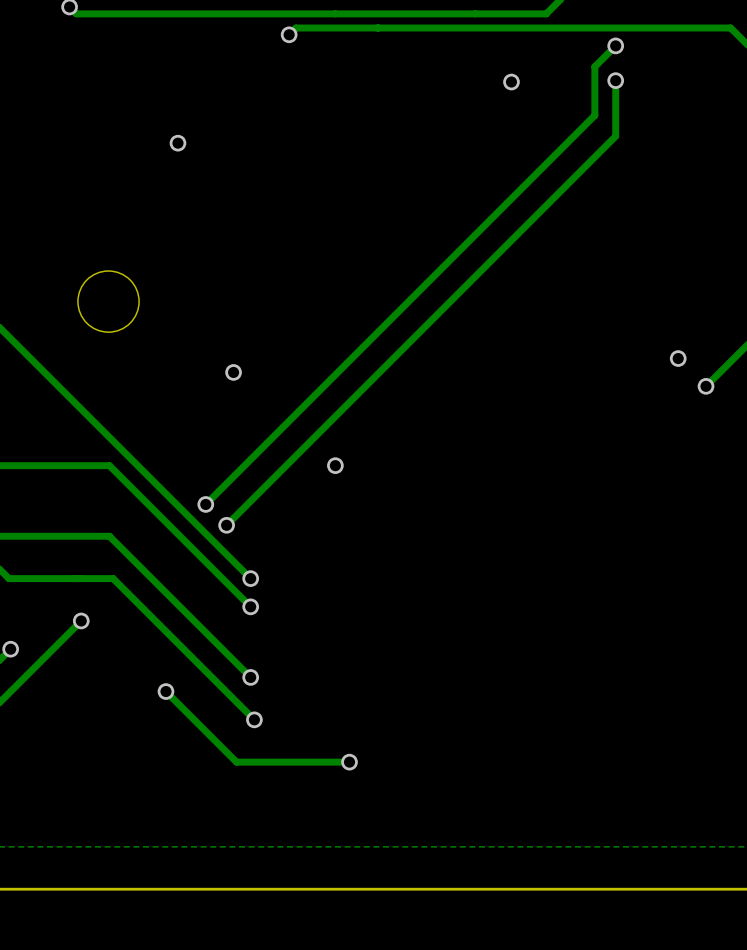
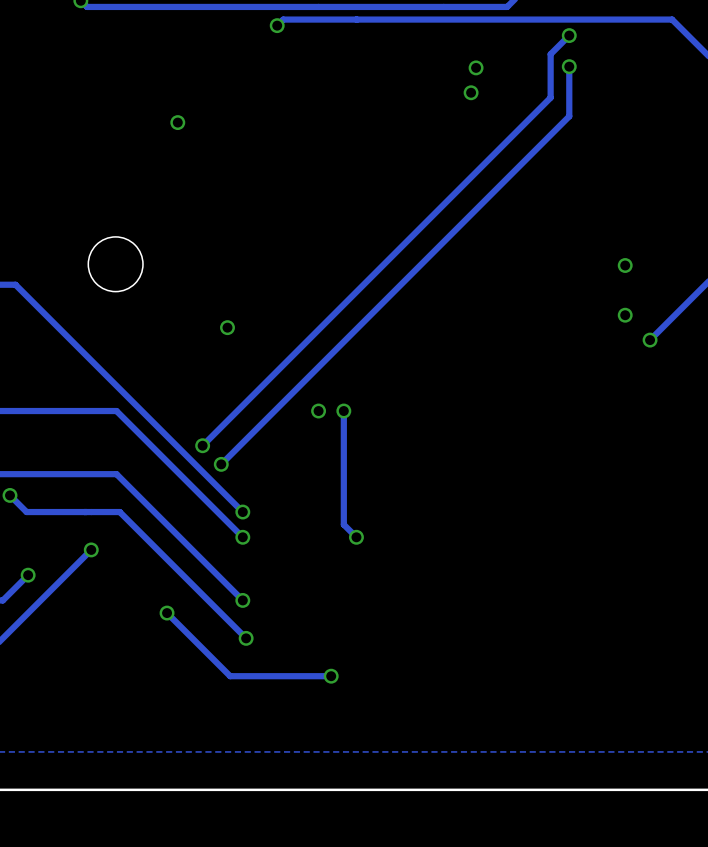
via: none -> (471, 92)
via: none -> (625, 265)
track: none -> (343, 411) (343, 524) (356, 537)
via: none -> (343, 411)
via: none -> (356, 537)

